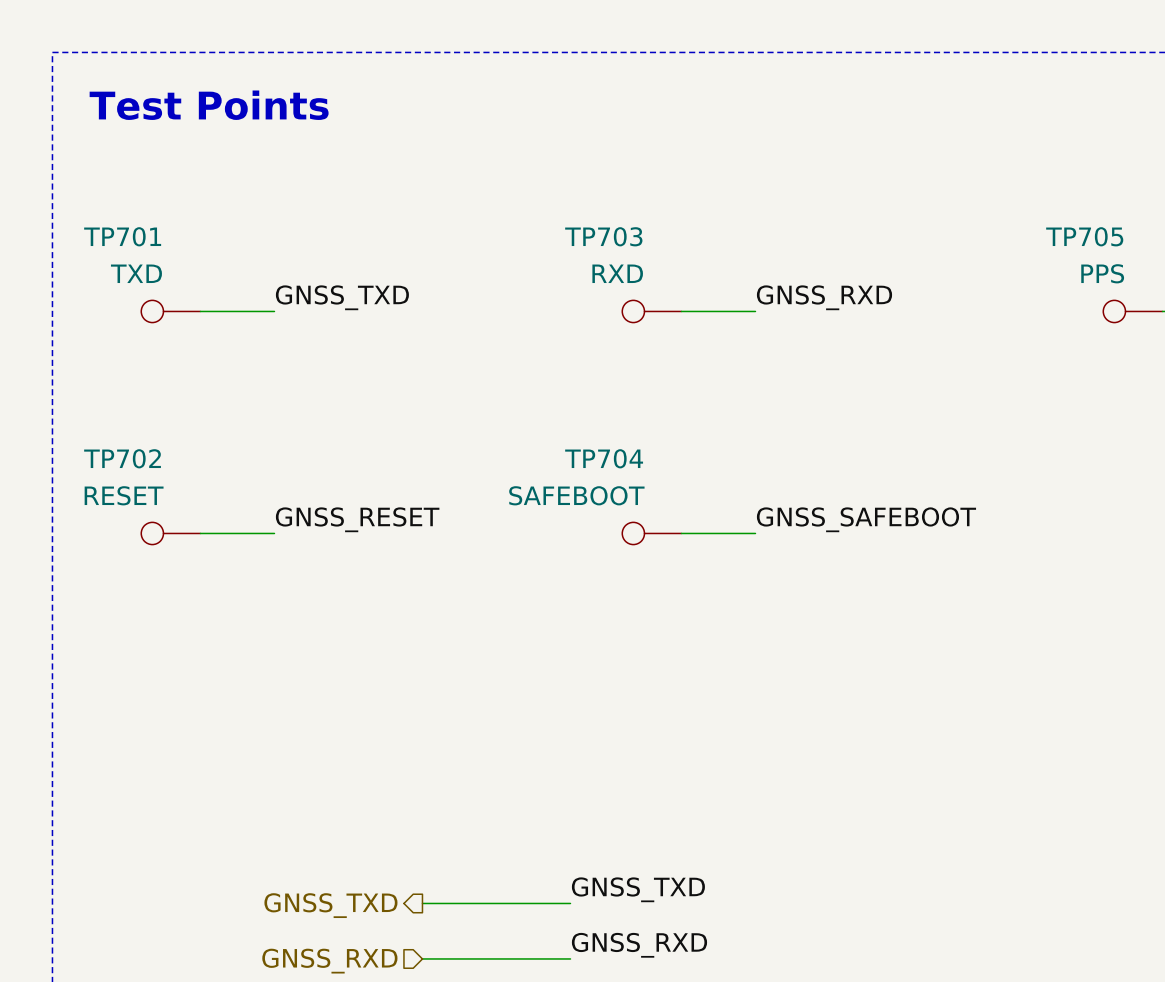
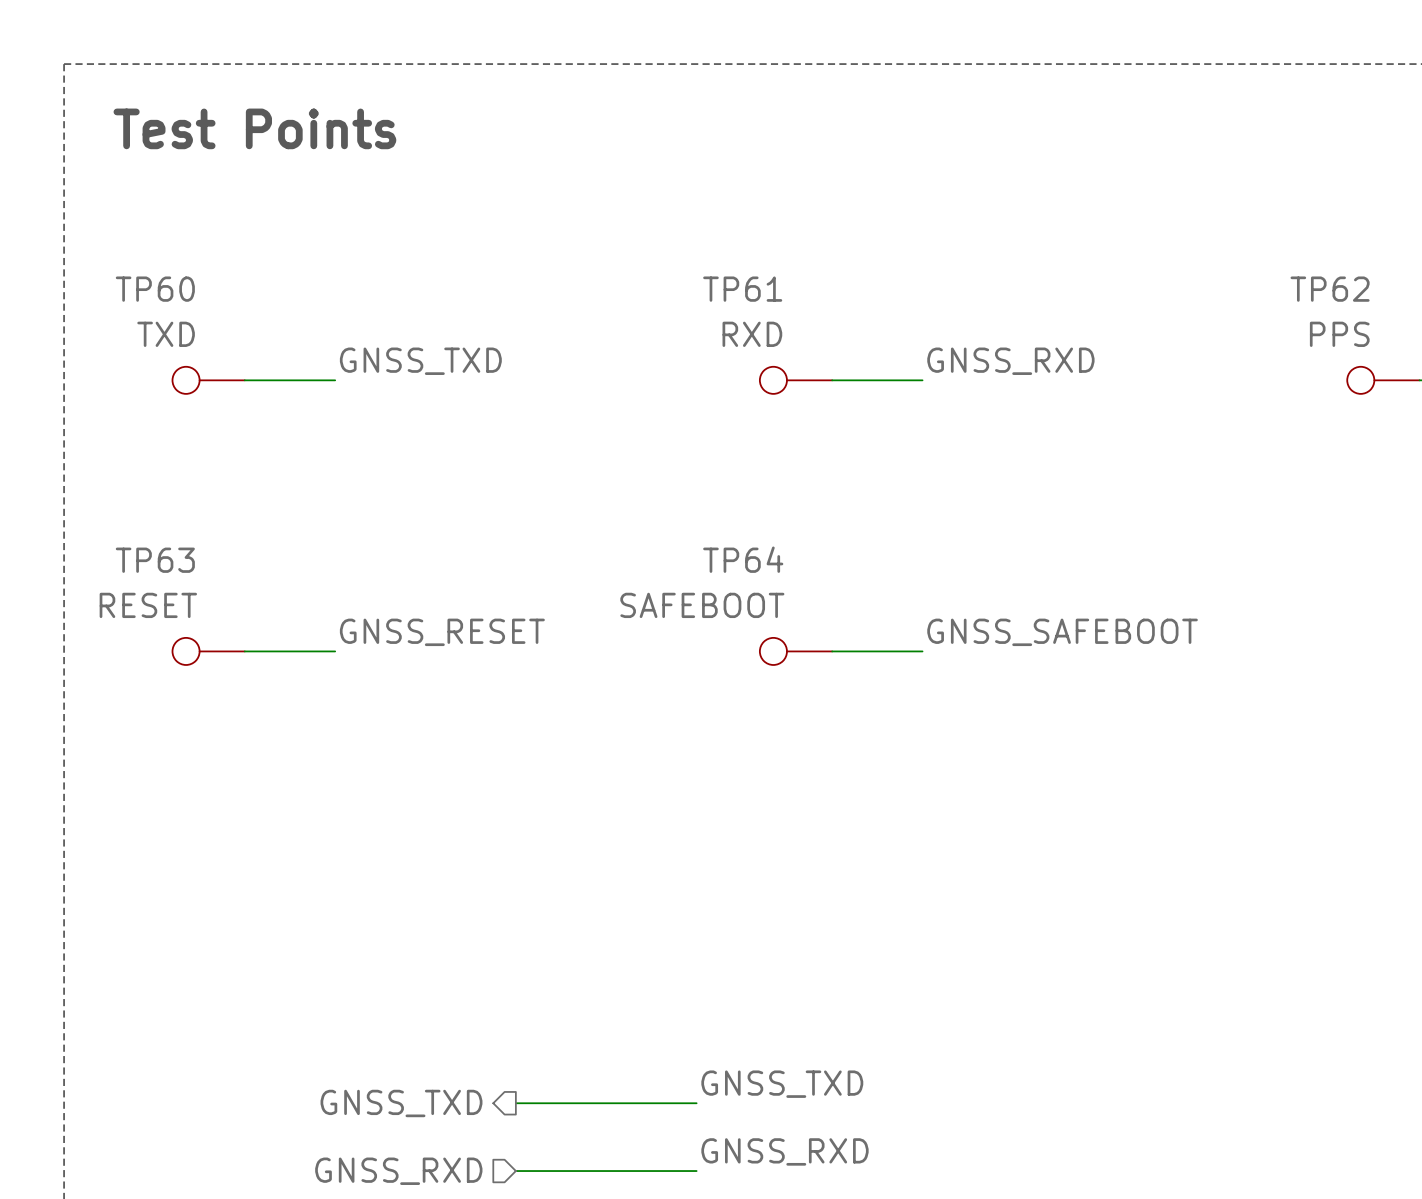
TP701 name: TP701 (122, 236) -> TP60 (155, 289)
TP703 name: TP703 (603, 236) -> TP61 (742, 289)
TP705 name: TP705 (1084, 236) -> TP62 (1330, 289)
TP702 name: TP702 (122, 458) -> TP63 (155, 560)
TP704 name: TP704 (604, 458) -> TP64 (743, 559)

